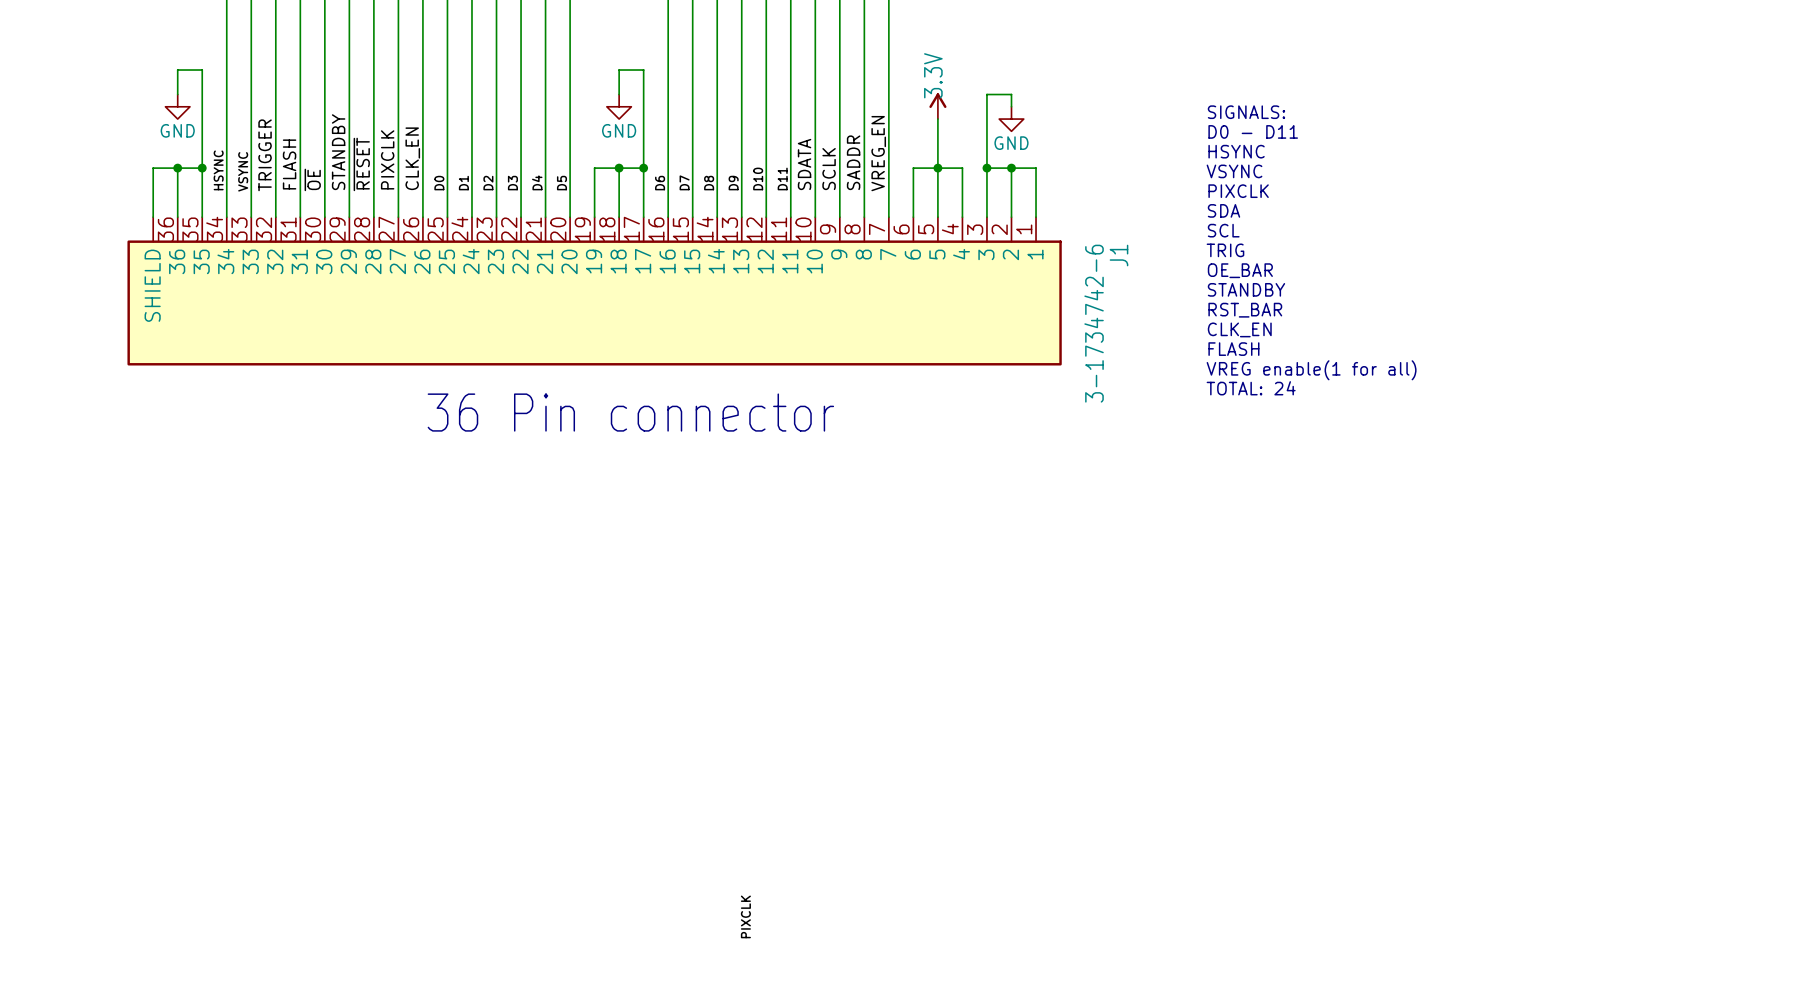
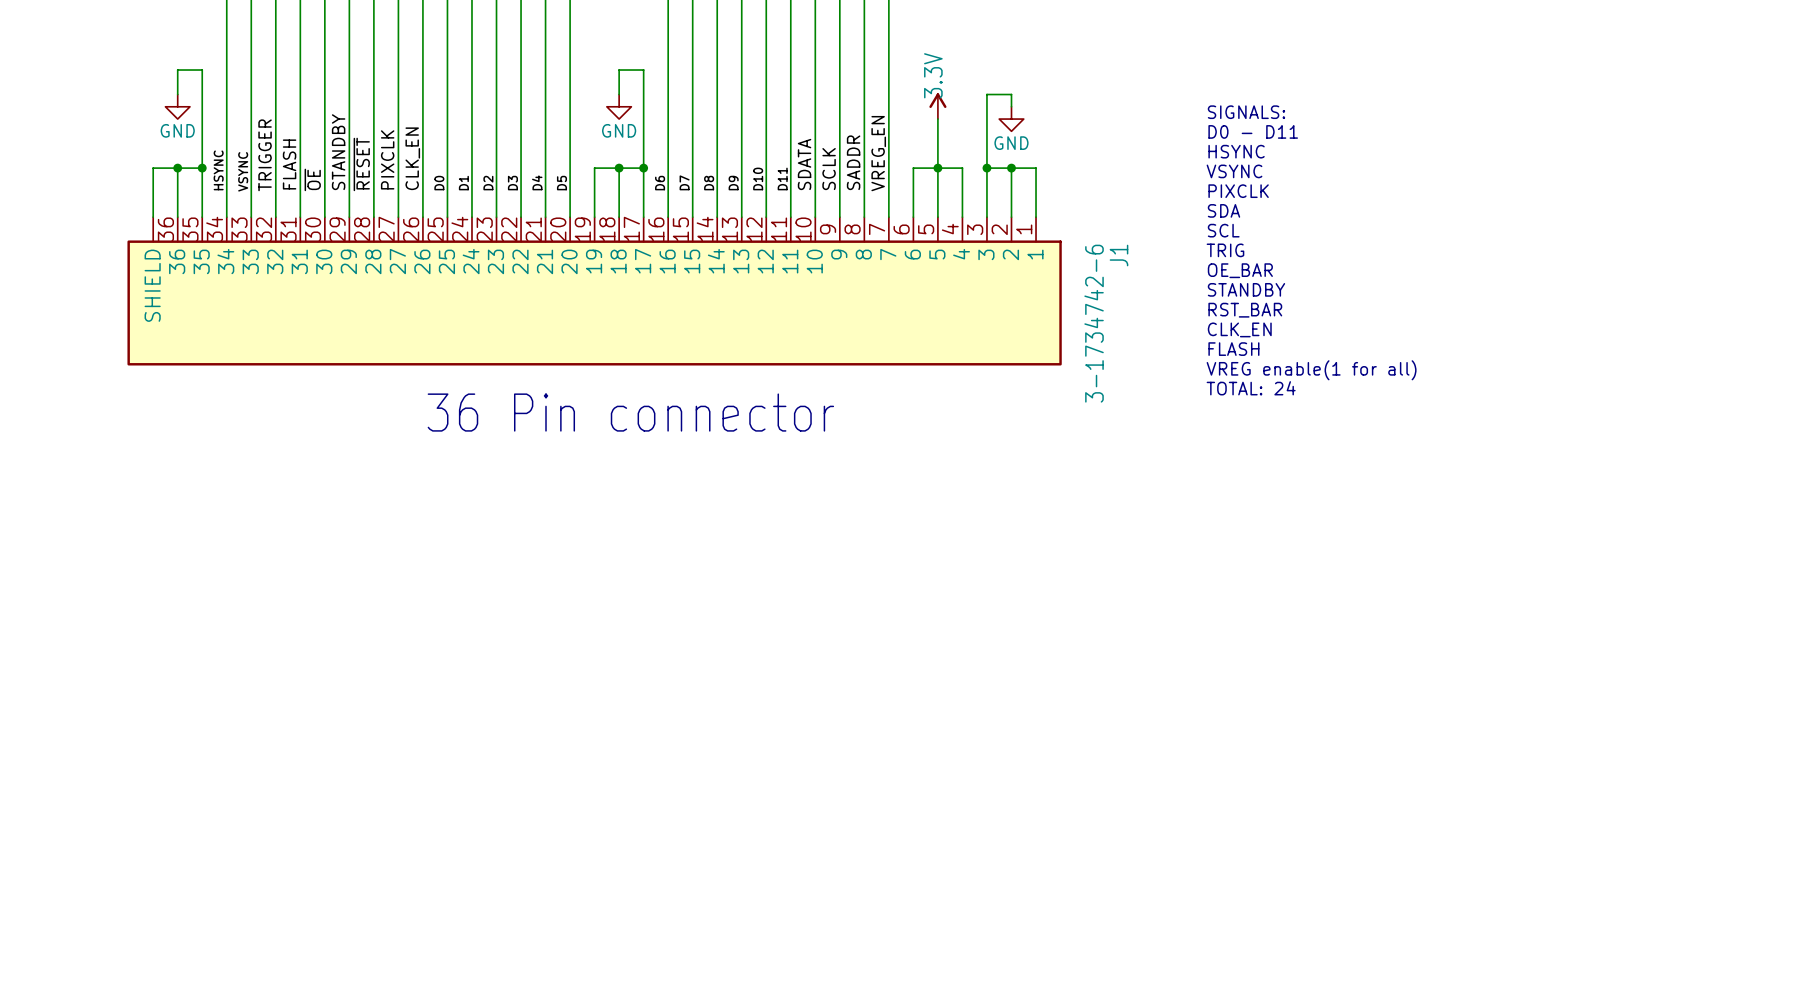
label: PIXCLK (745, 916) -> none

